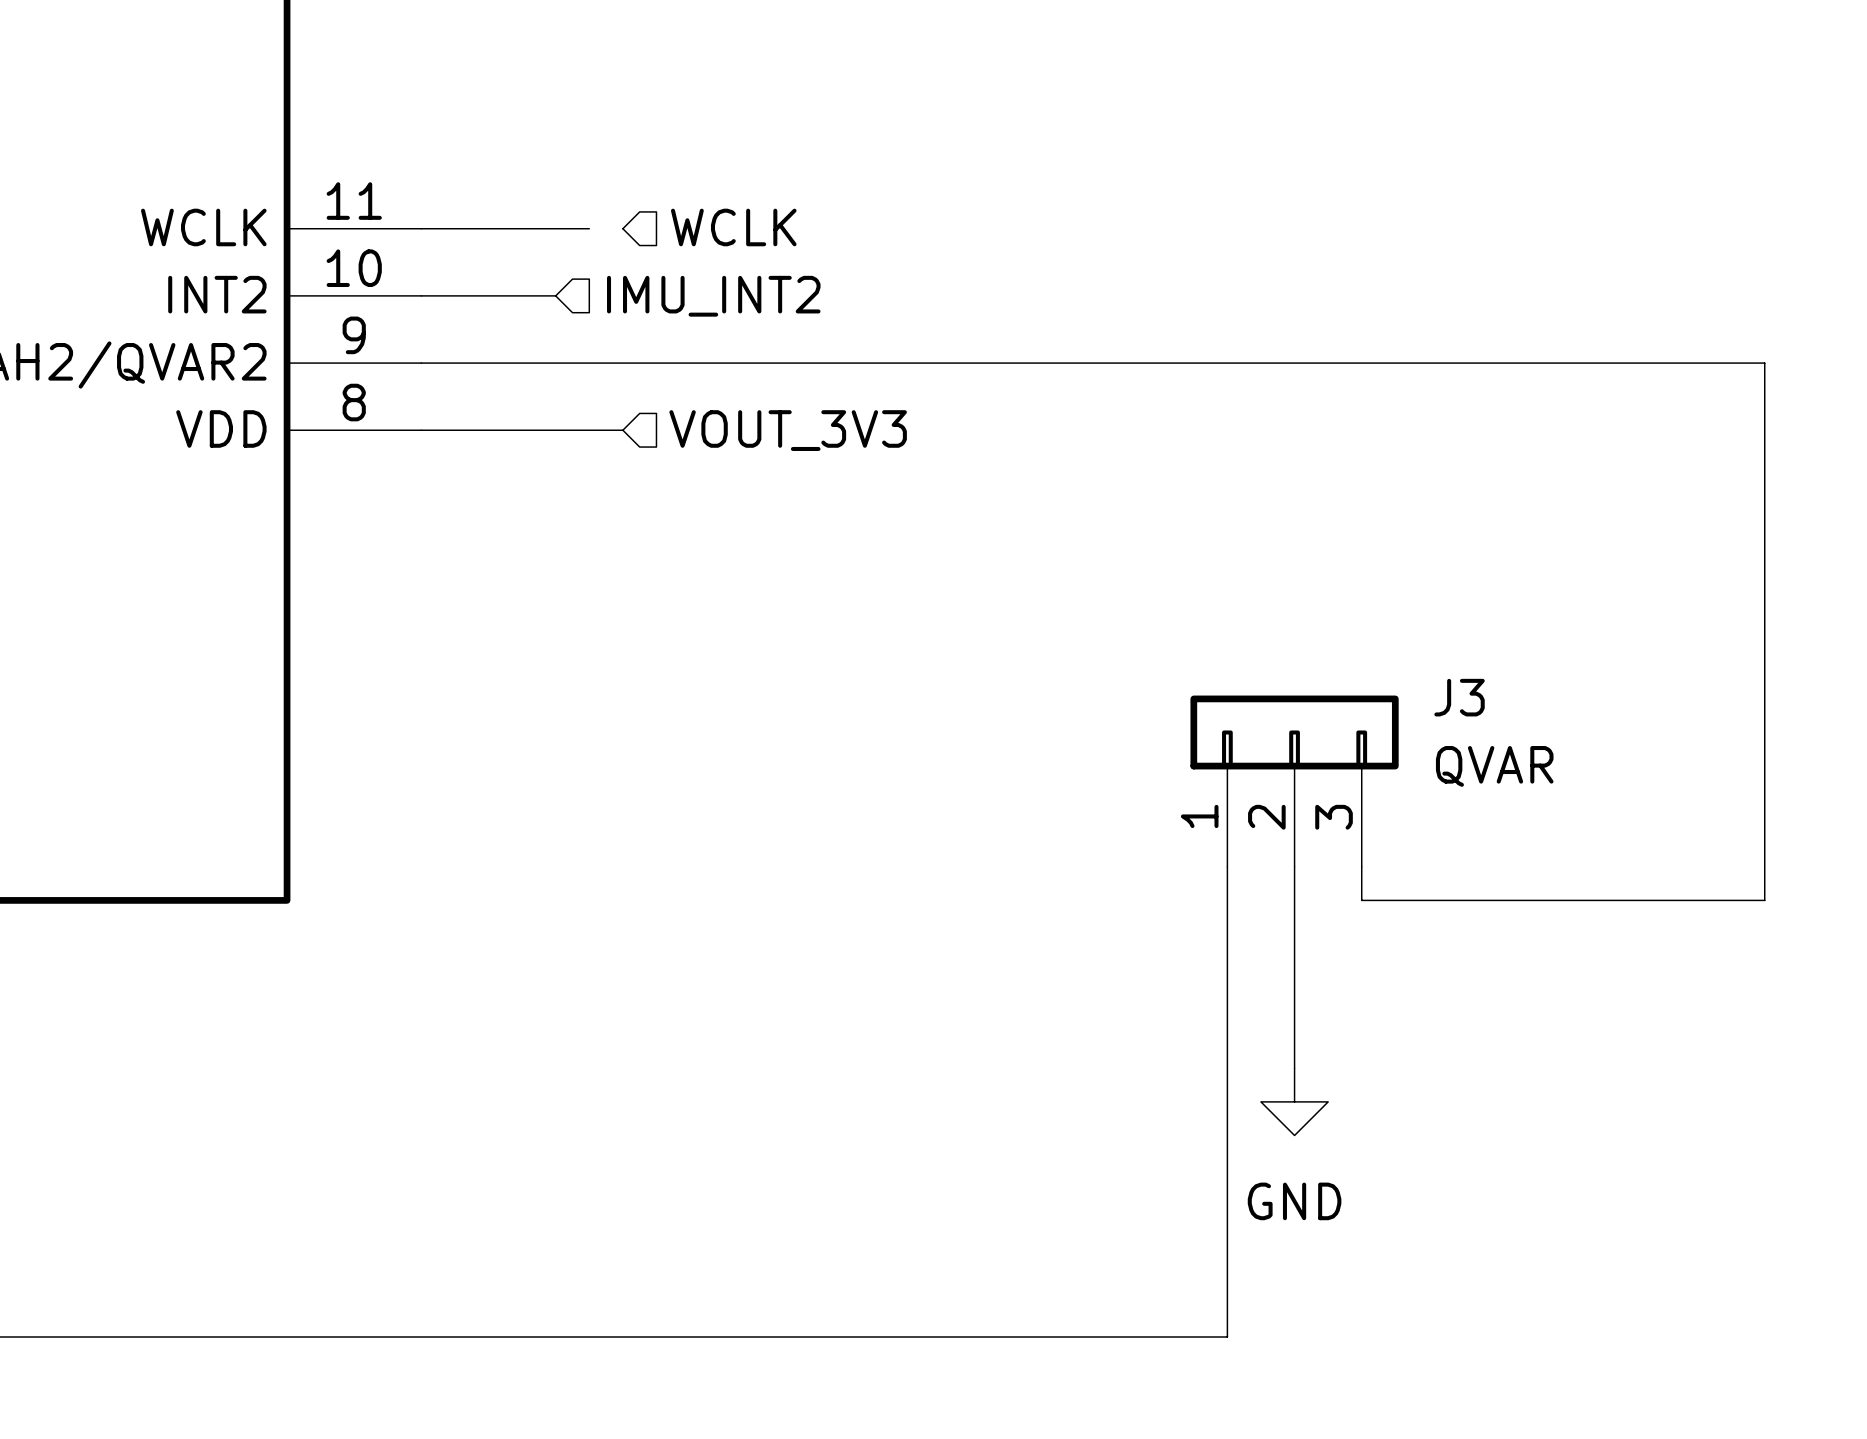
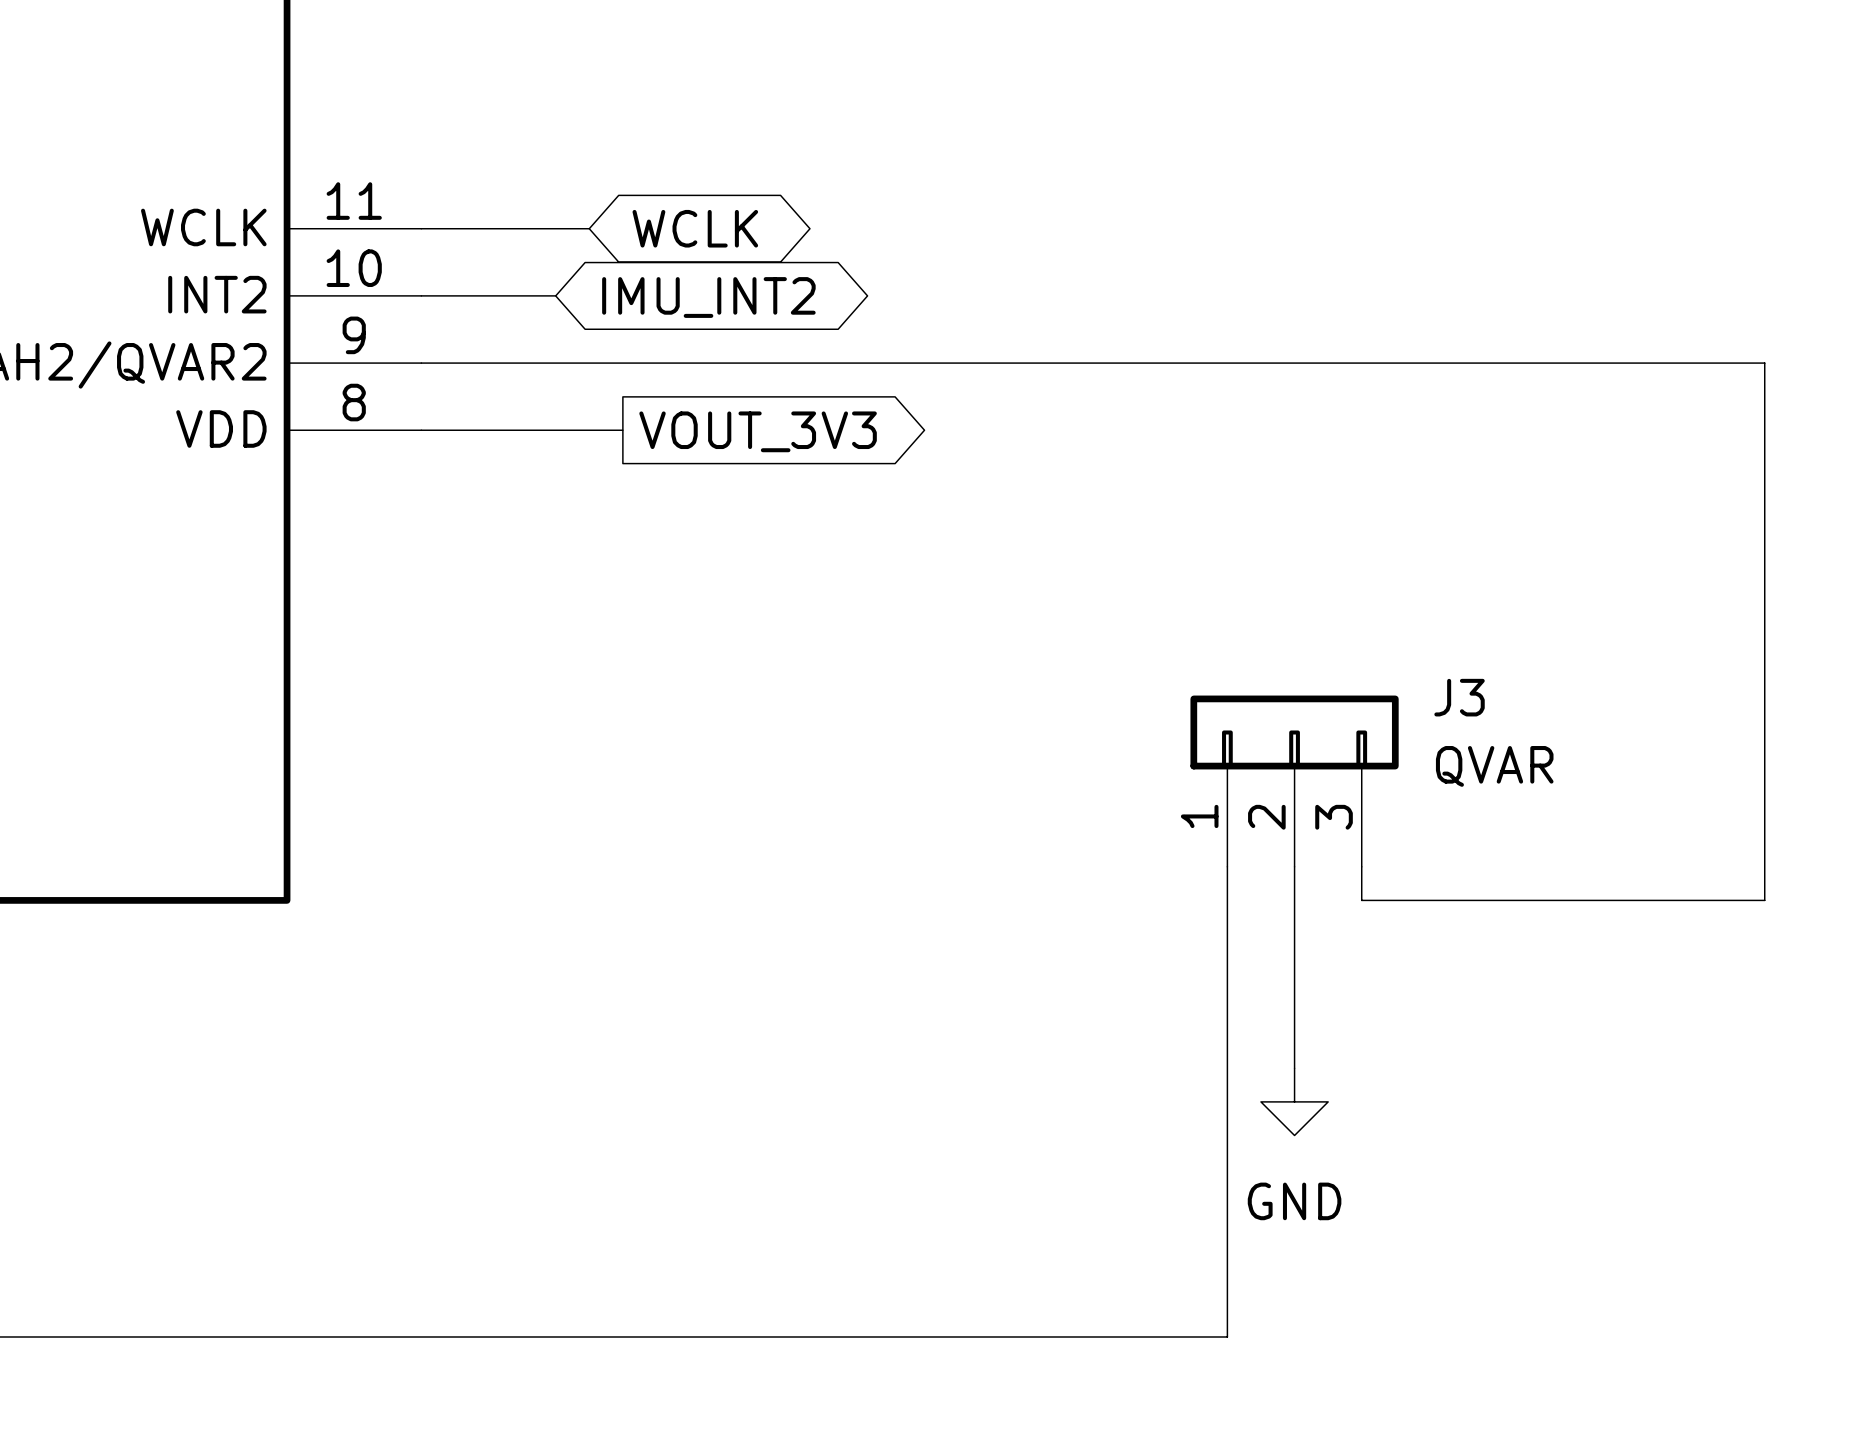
hierarchical label: WCLK (733, 227) -> none
global label: none -> WCLK (695, 228)
hierarchical label: IMU_INT2 (713, 296) -> none
global label: none -> IMU_INT2 (708, 297)
hierarchical label: VOUT_3V3 (788, 430) -> none
global label: none -> VOUT_3V3 (758, 431)

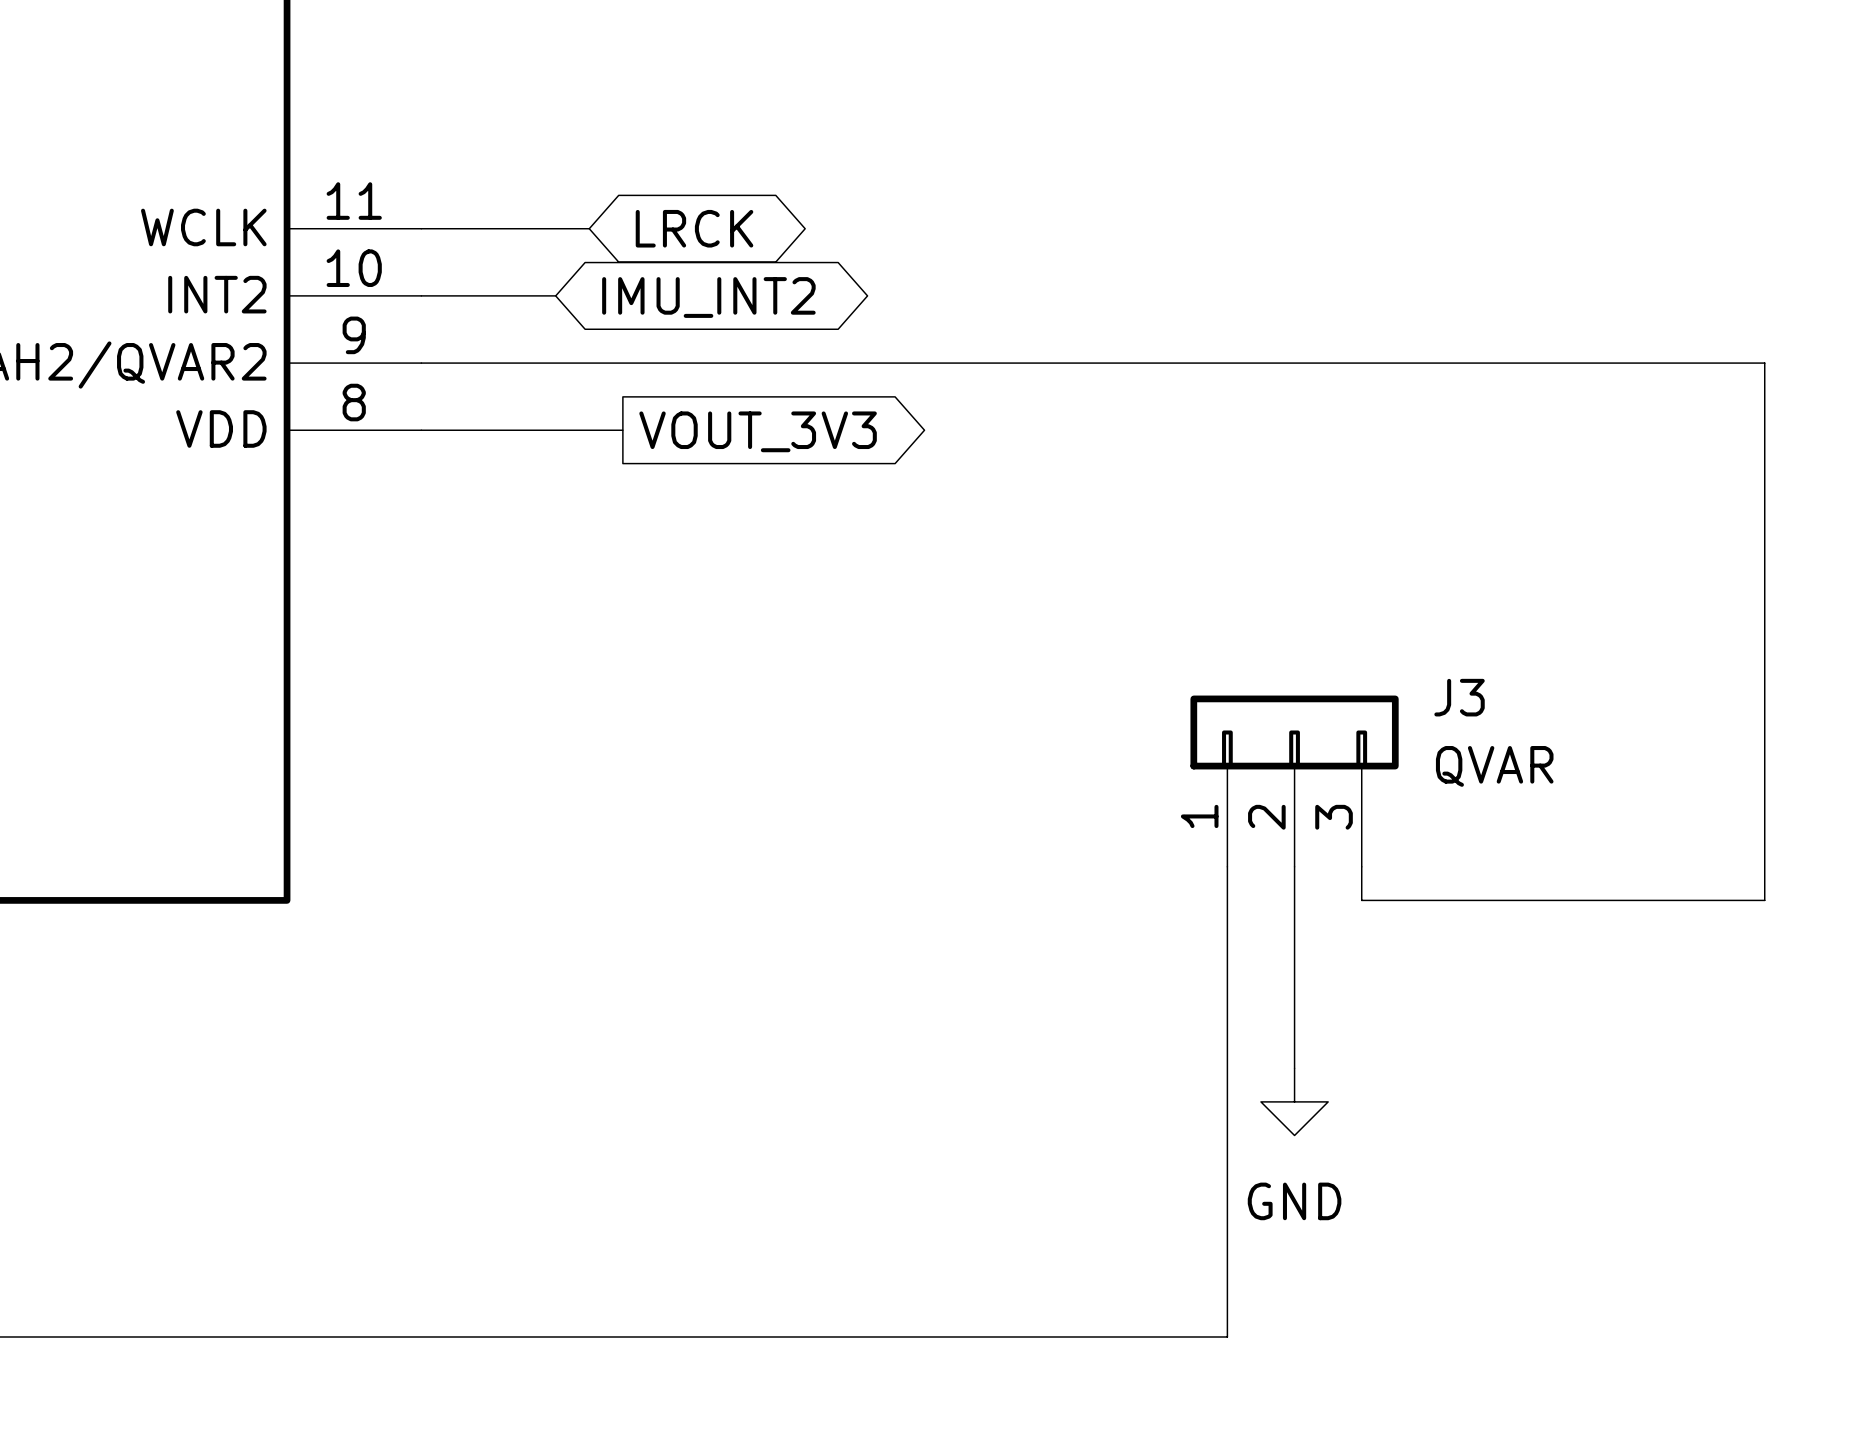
global label: WCLK (695, 228) -> LRCK (694, 228)

